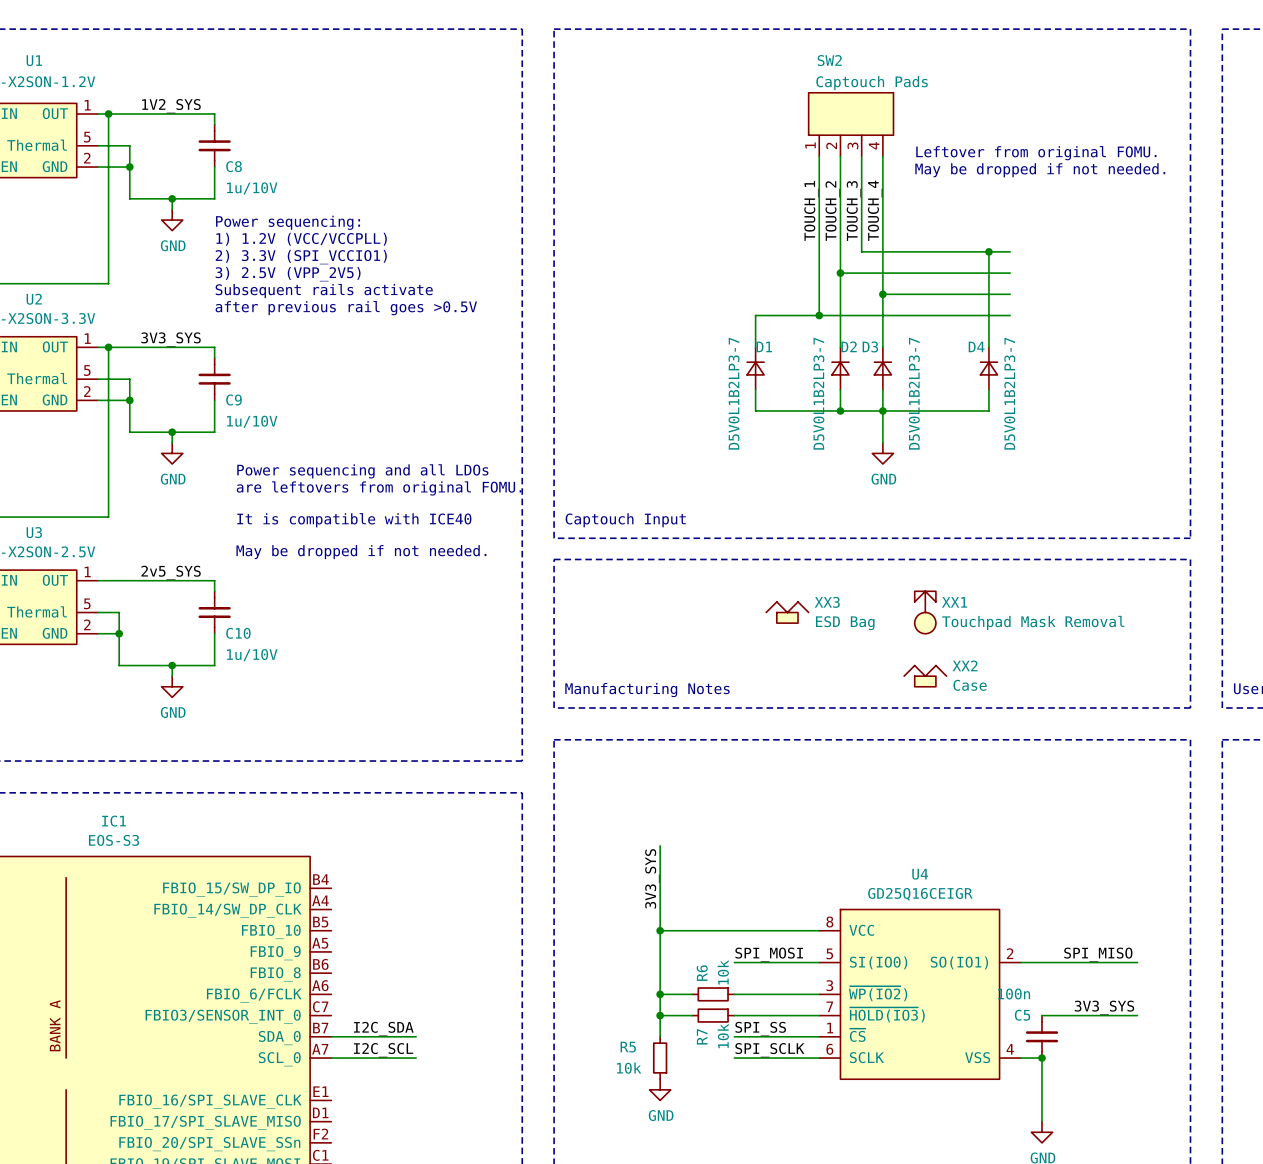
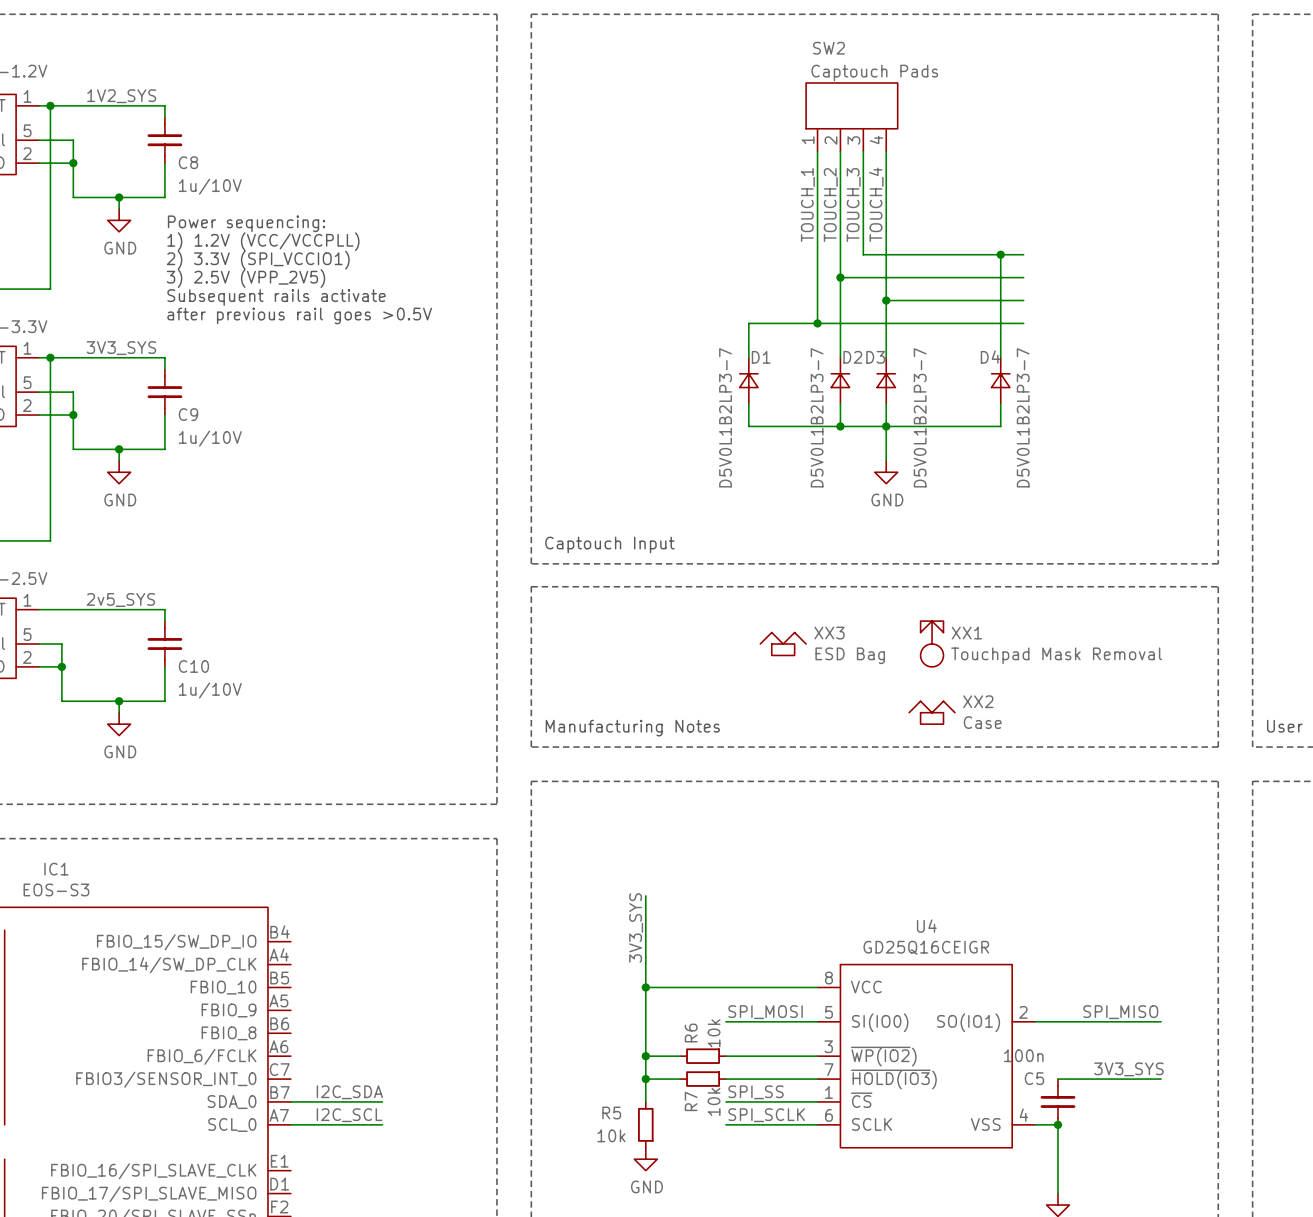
text: Leftover from original FOMU. (1036, 153) -> none
text: May be dropped if not needed. (1040, 170) -> none
text: Power sequencing and all LDOs (362, 471) -> none
text: are leftovers from original FOMU. (379, 488) -> none
text: It is compatible with ICE40 (354, 520) -> none
text: May be dropped if not needed. (361, 552) -> none

